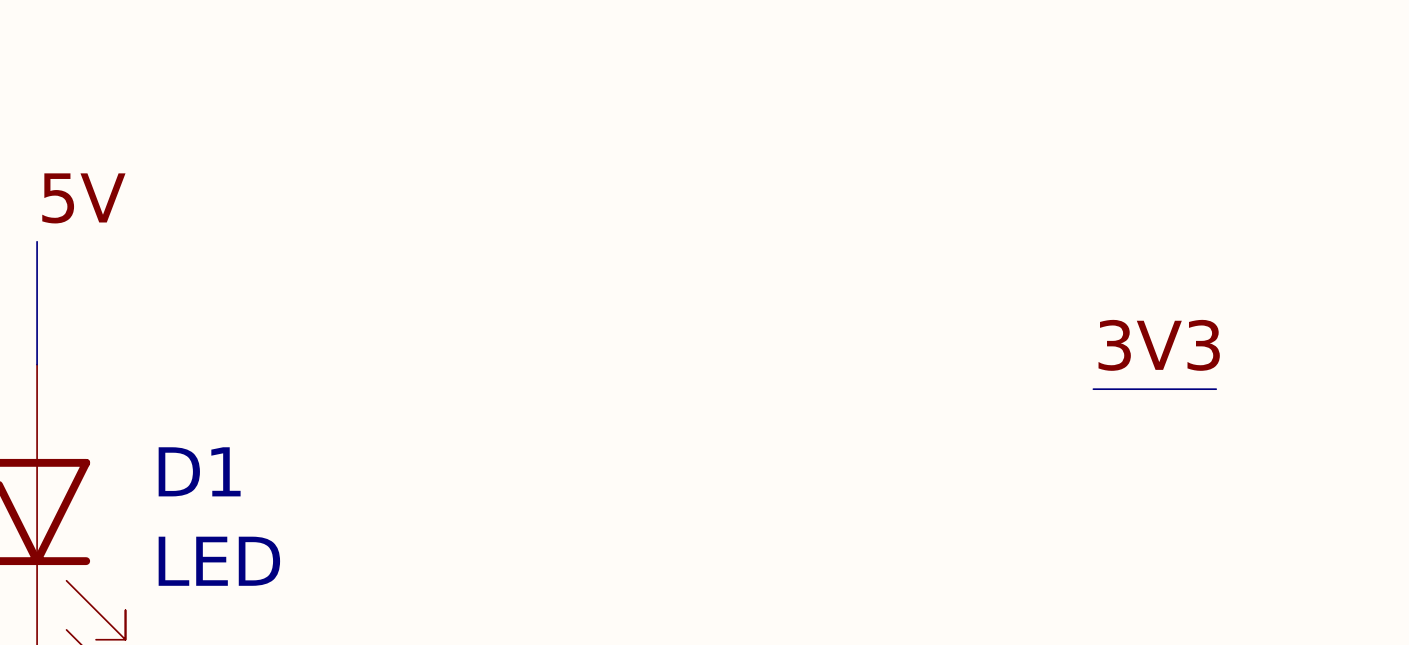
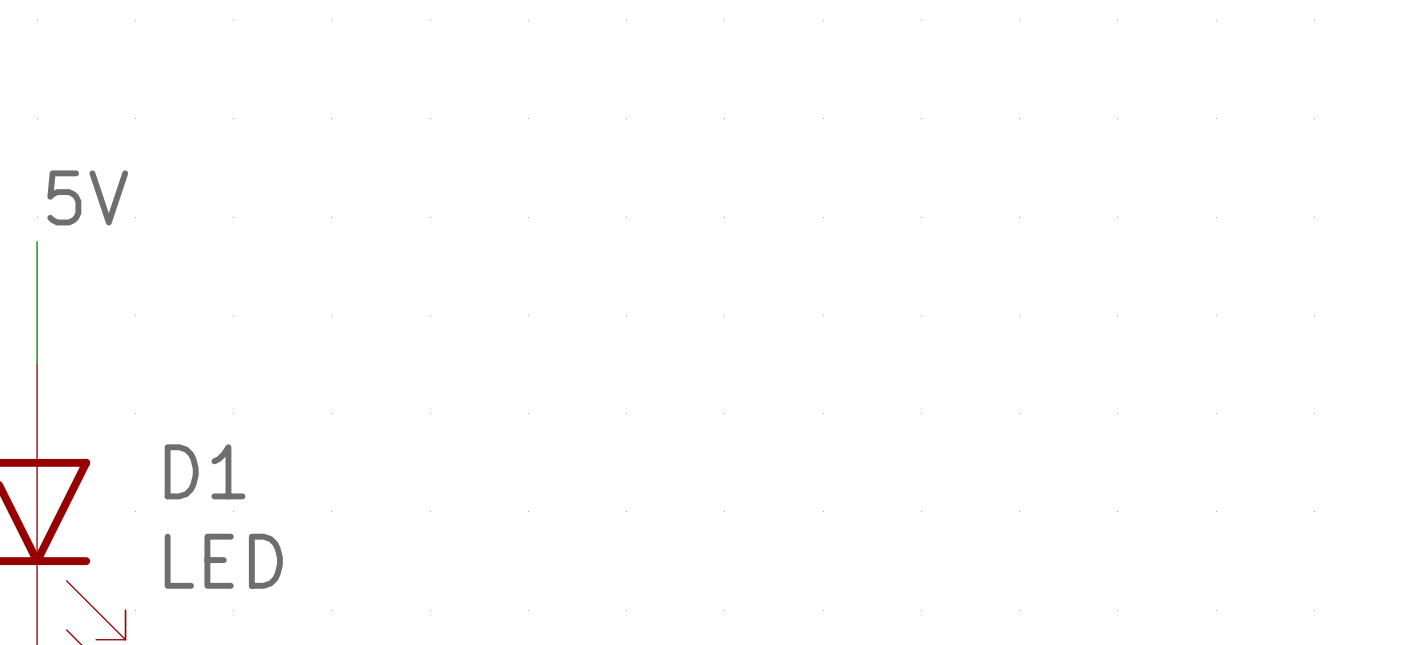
label: 3V3 (1159, 345) -> none
wire: (1093, 389) (1216, 389) -> none

